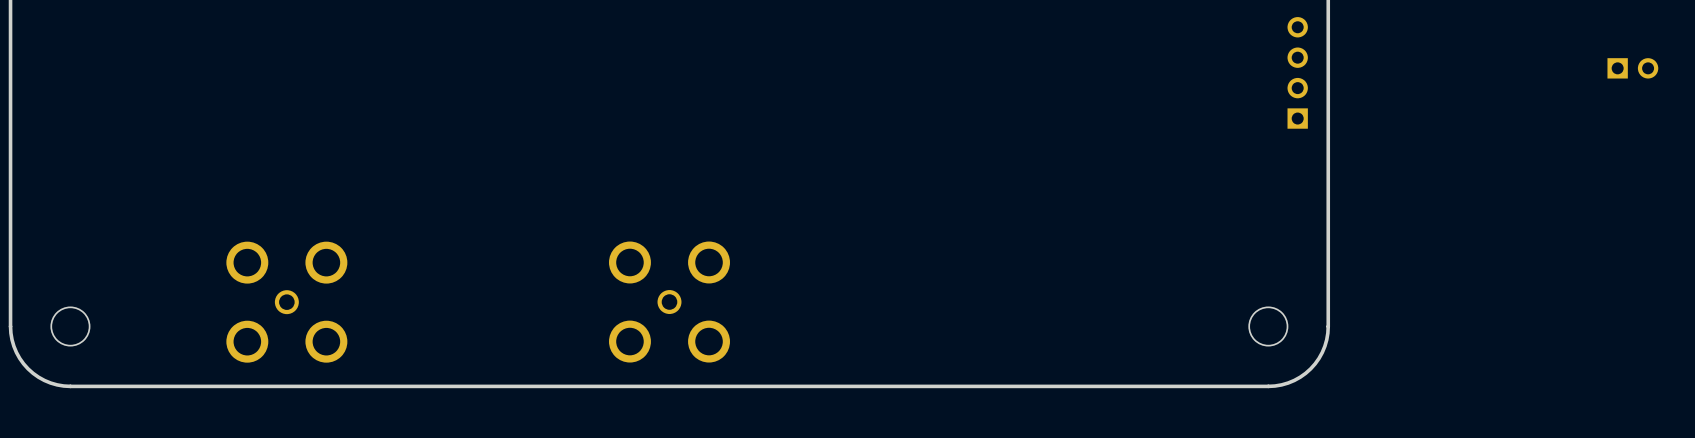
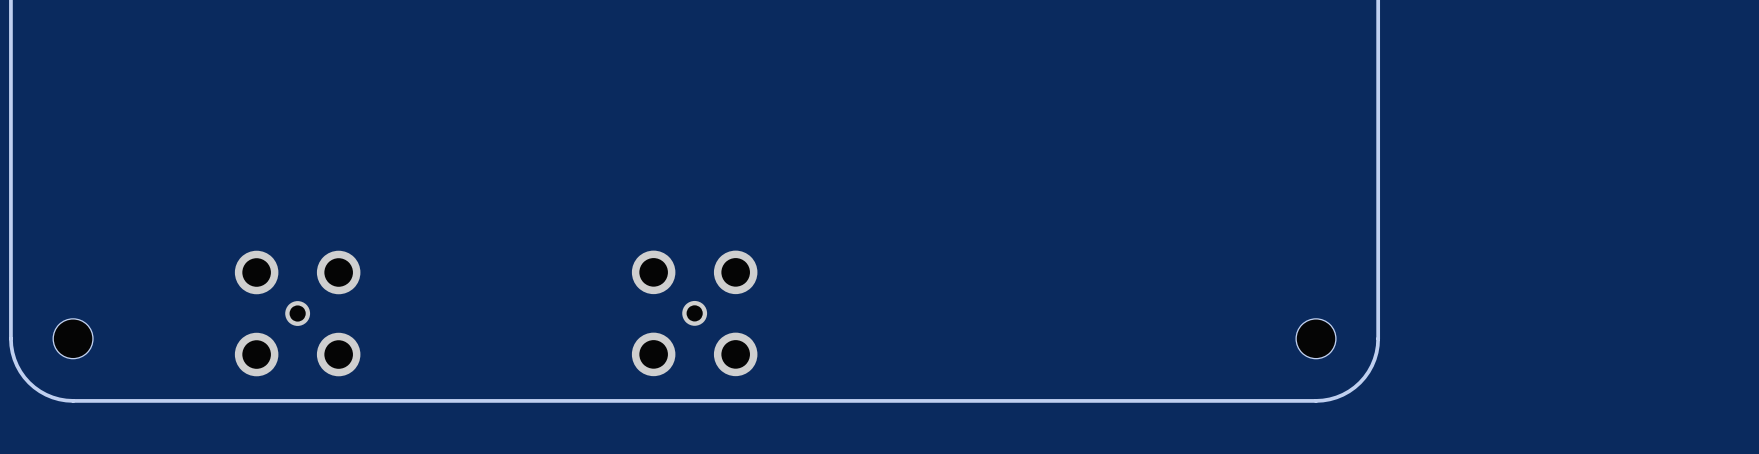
part: (1632, 68) -> none
part: (1297, 72) -> none

